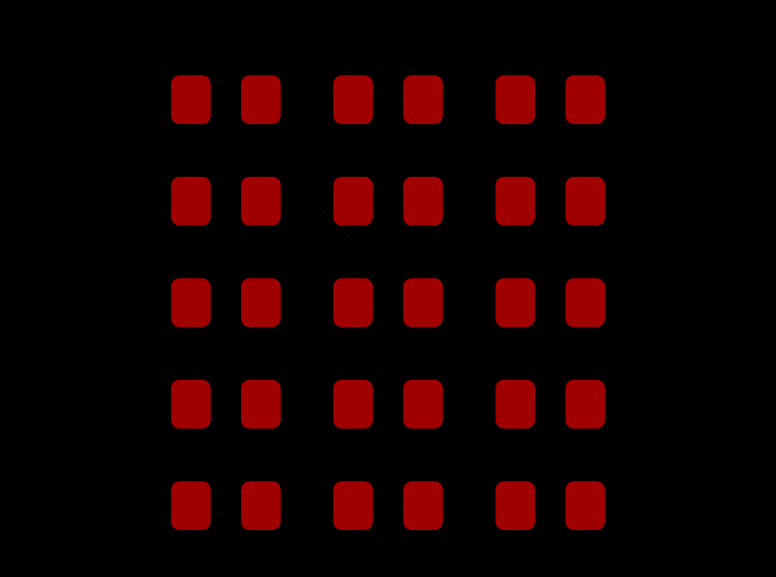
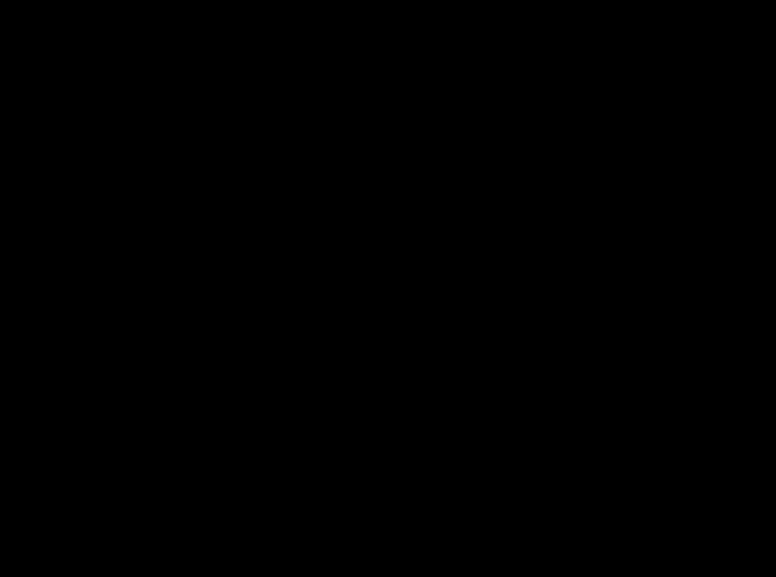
part: (225, 99) -> none
part: (388, 99) -> none
part: (550, 99) -> none
part: (225, 201) -> none
part: (388, 201) -> none
part: (550, 201) -> none
part: (225, 302) -> none
part: (388, 302) -> none
part: (550, 302) -> none
part: (225, 404) -> none
part: (388, 404) -> none
part: (550, 404) -> none
part: (225, 505) -> none
part: (388, 505) -> none
part: (550, 505) -> none

